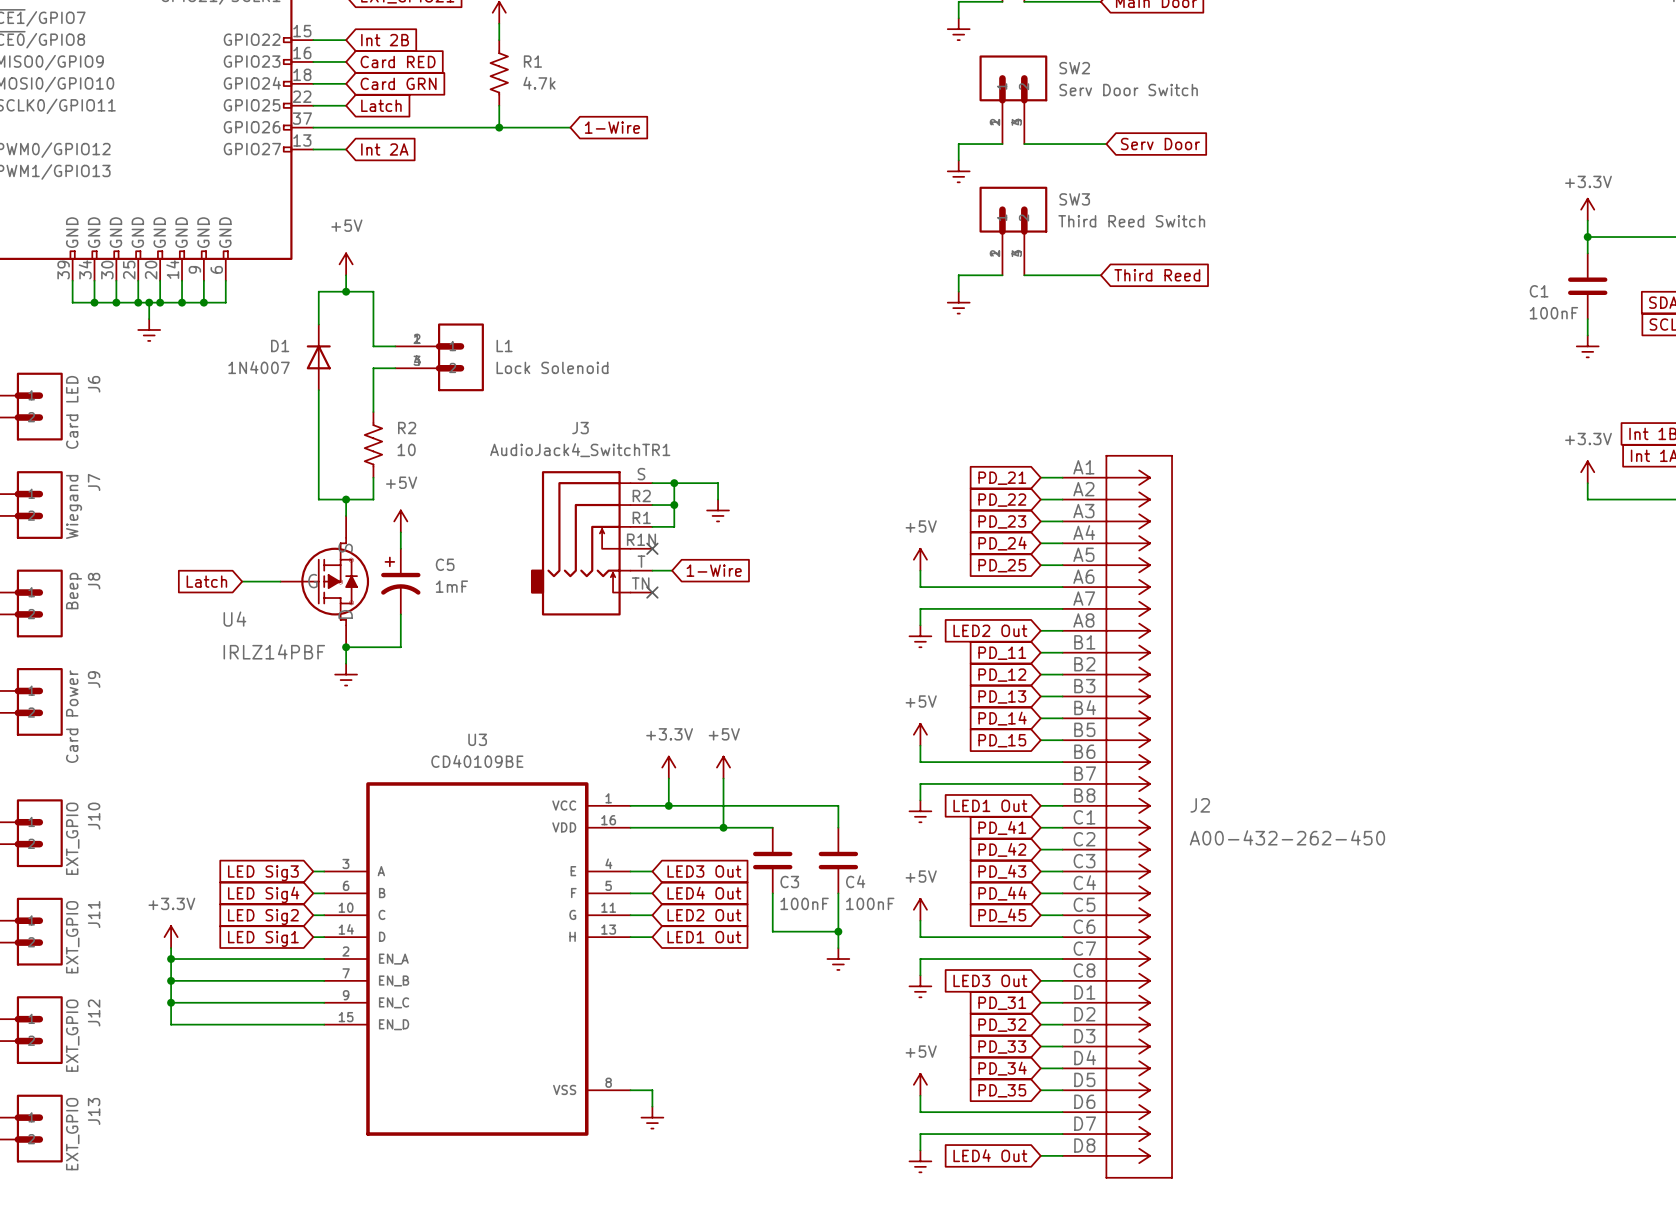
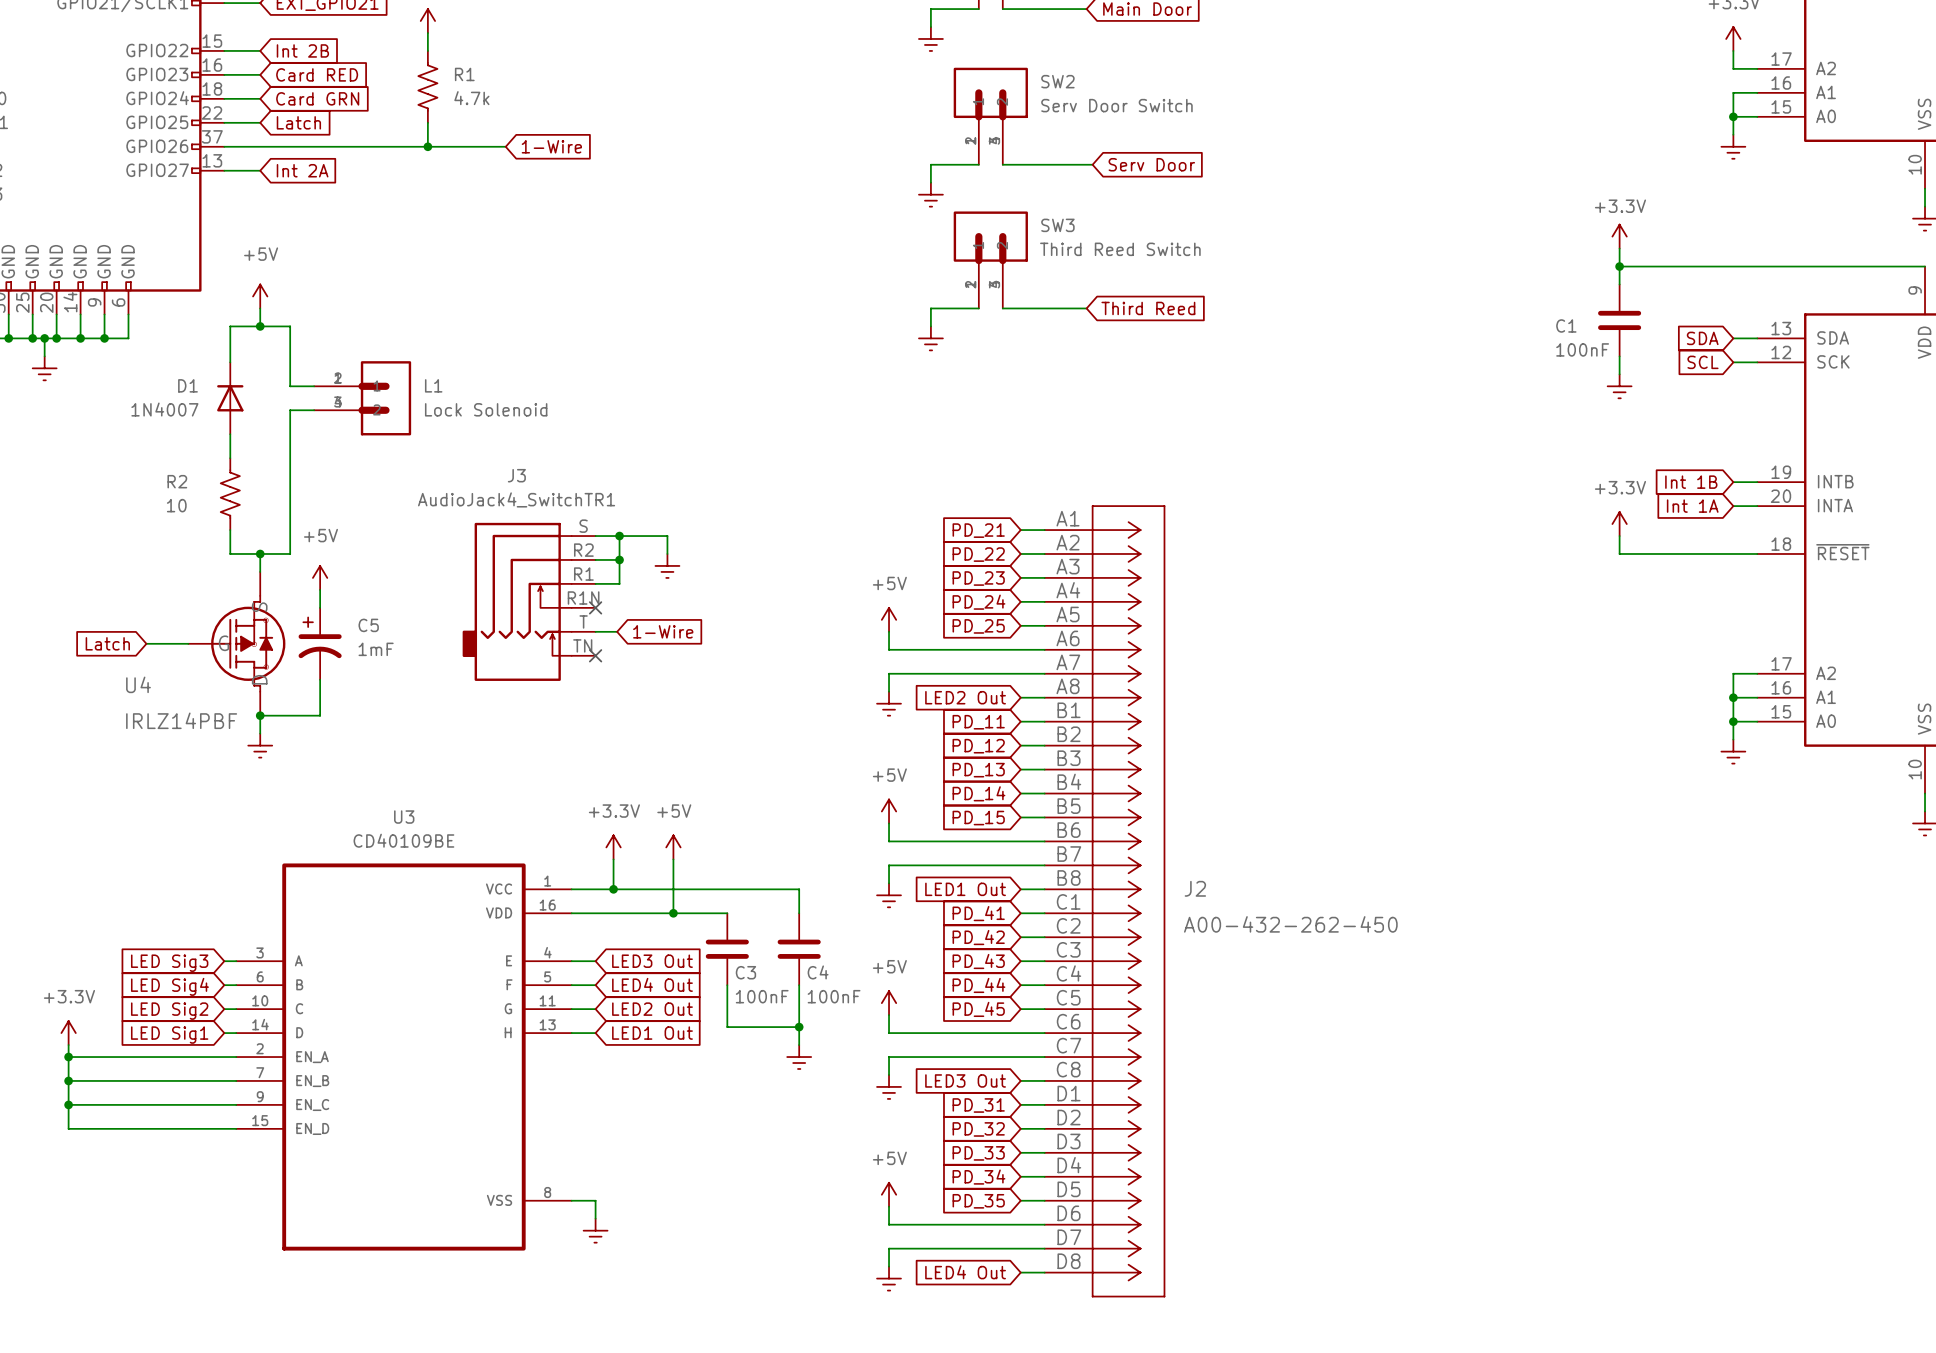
R2 name position: R2 (407, 428) -> R2 (177, 481)
R2 position: (373, 444) -> (230, 494)
R2 value position: 10 (406, 449) -> 10 (176, 505)

